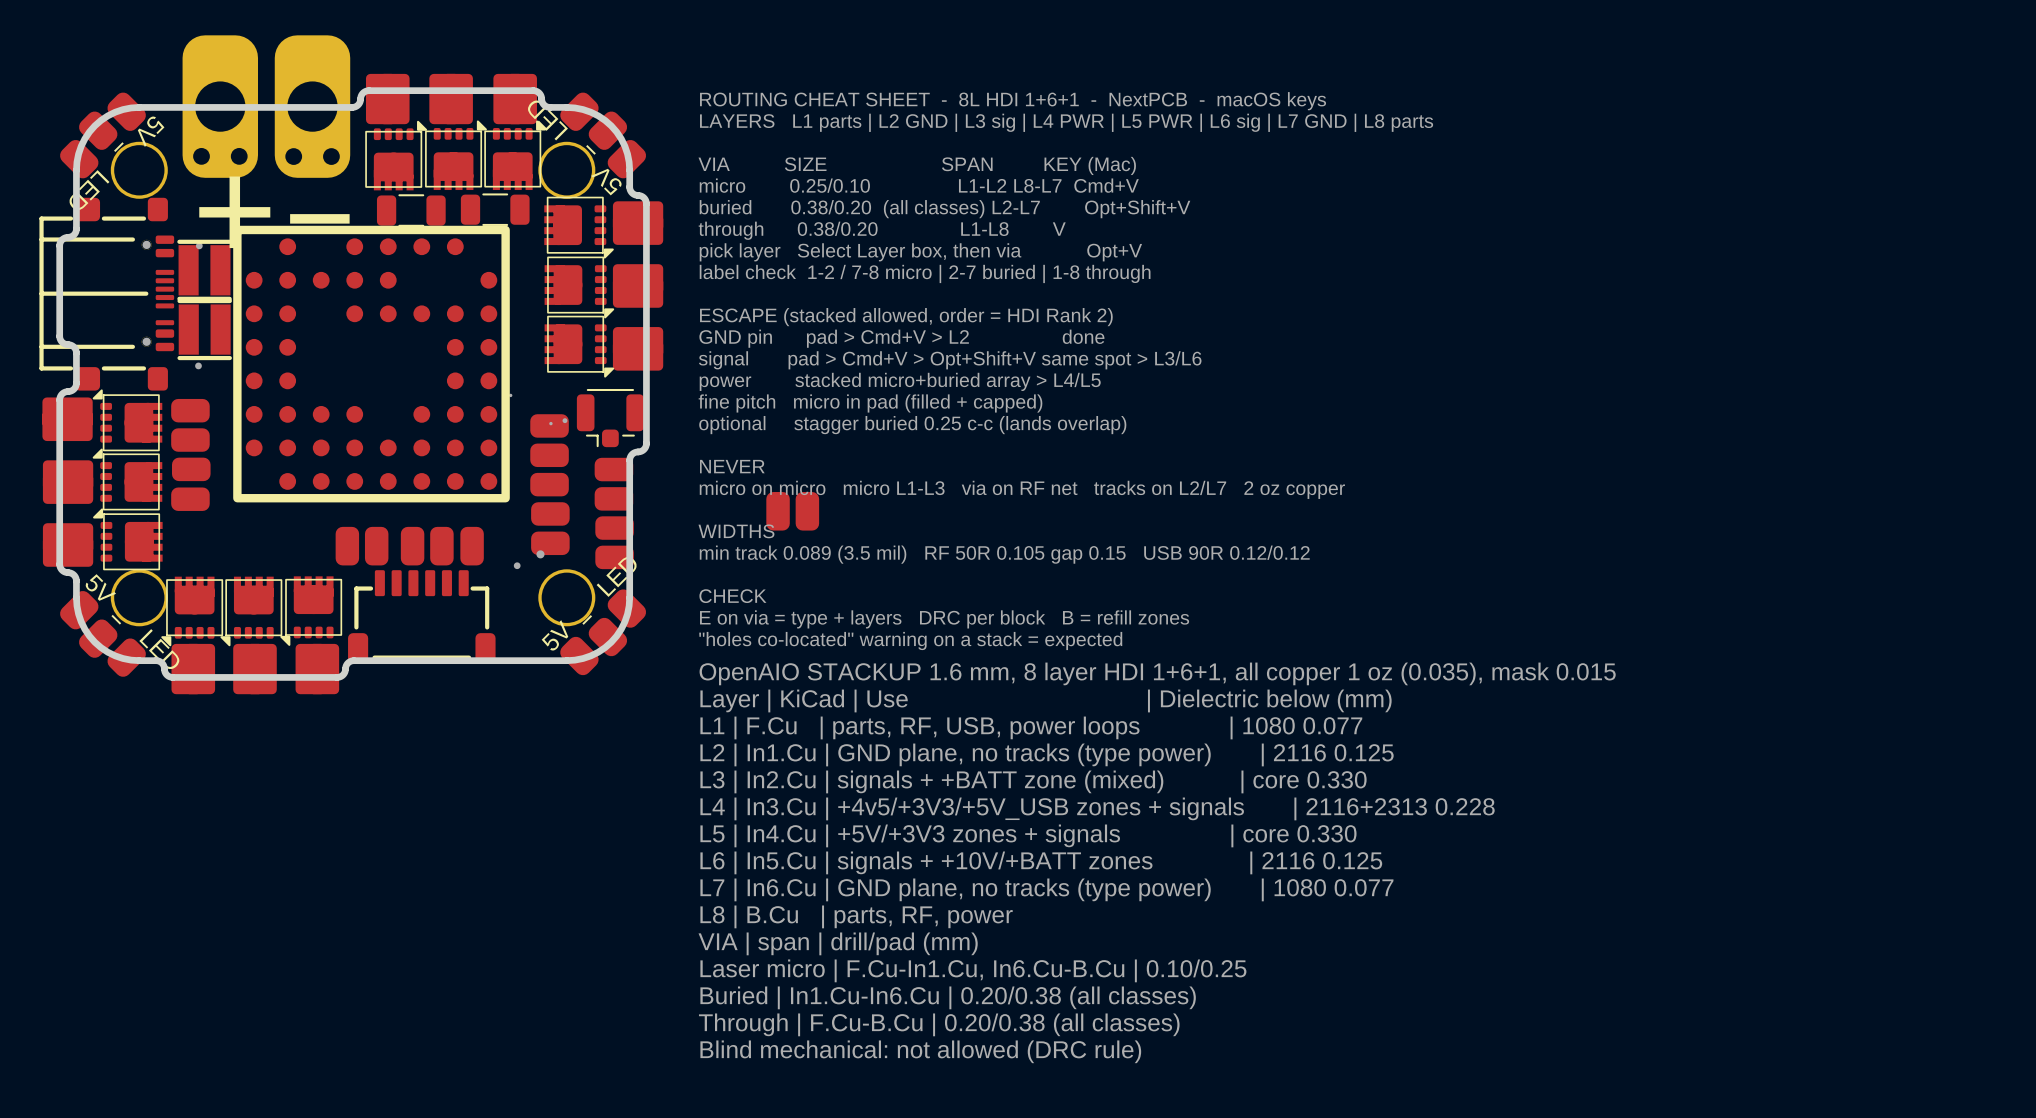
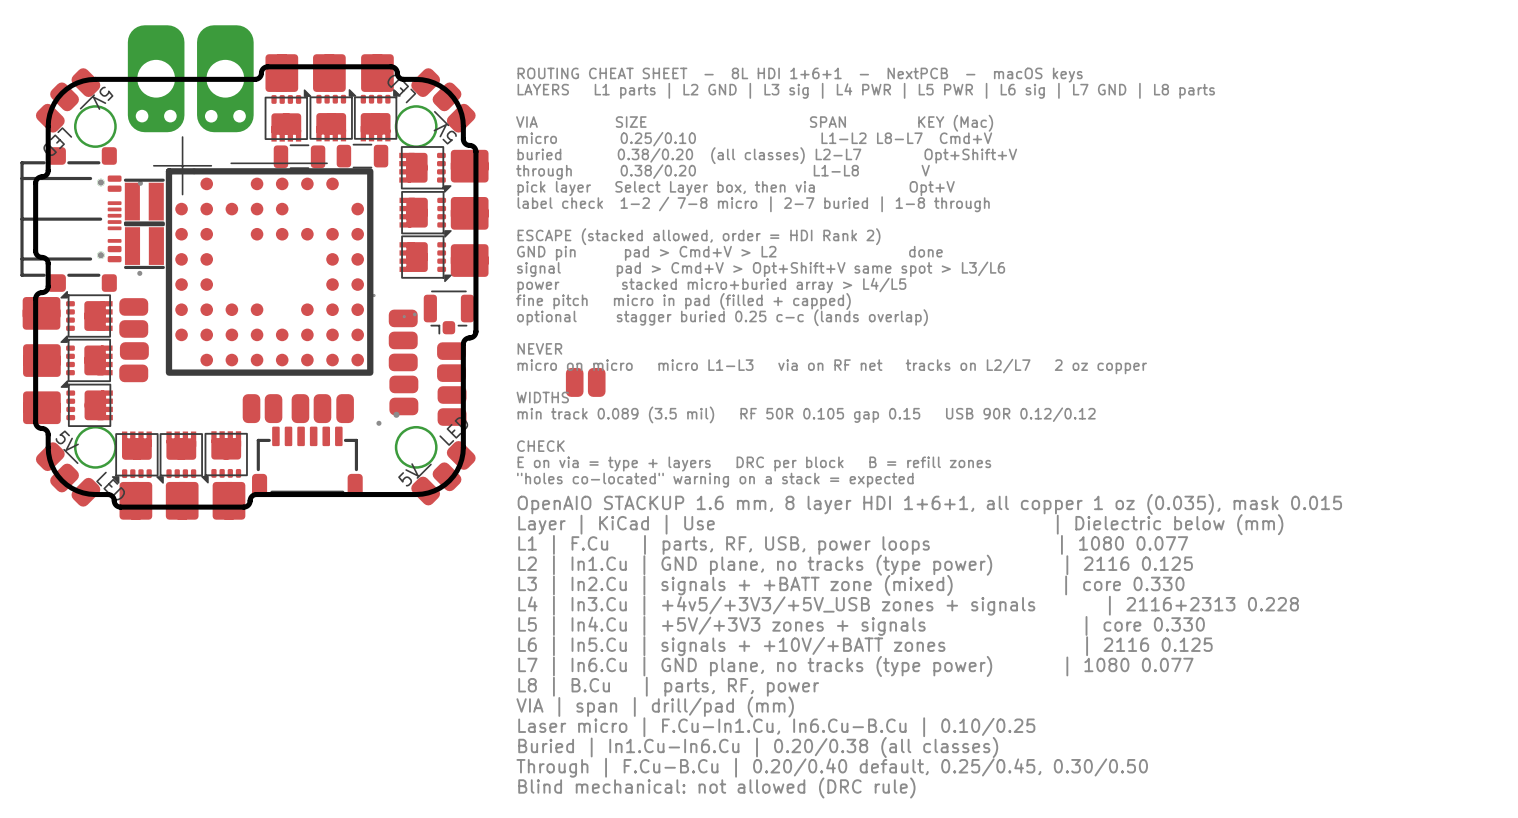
text: Through | F.Cu-B.Cu | 0.20/0.38 (all classes) (939, 1024) -> Through | F.Cu-B.Cu | 0.20/0.40 default, 0.25/0.45, 0.30/0.50 (832, 767)

